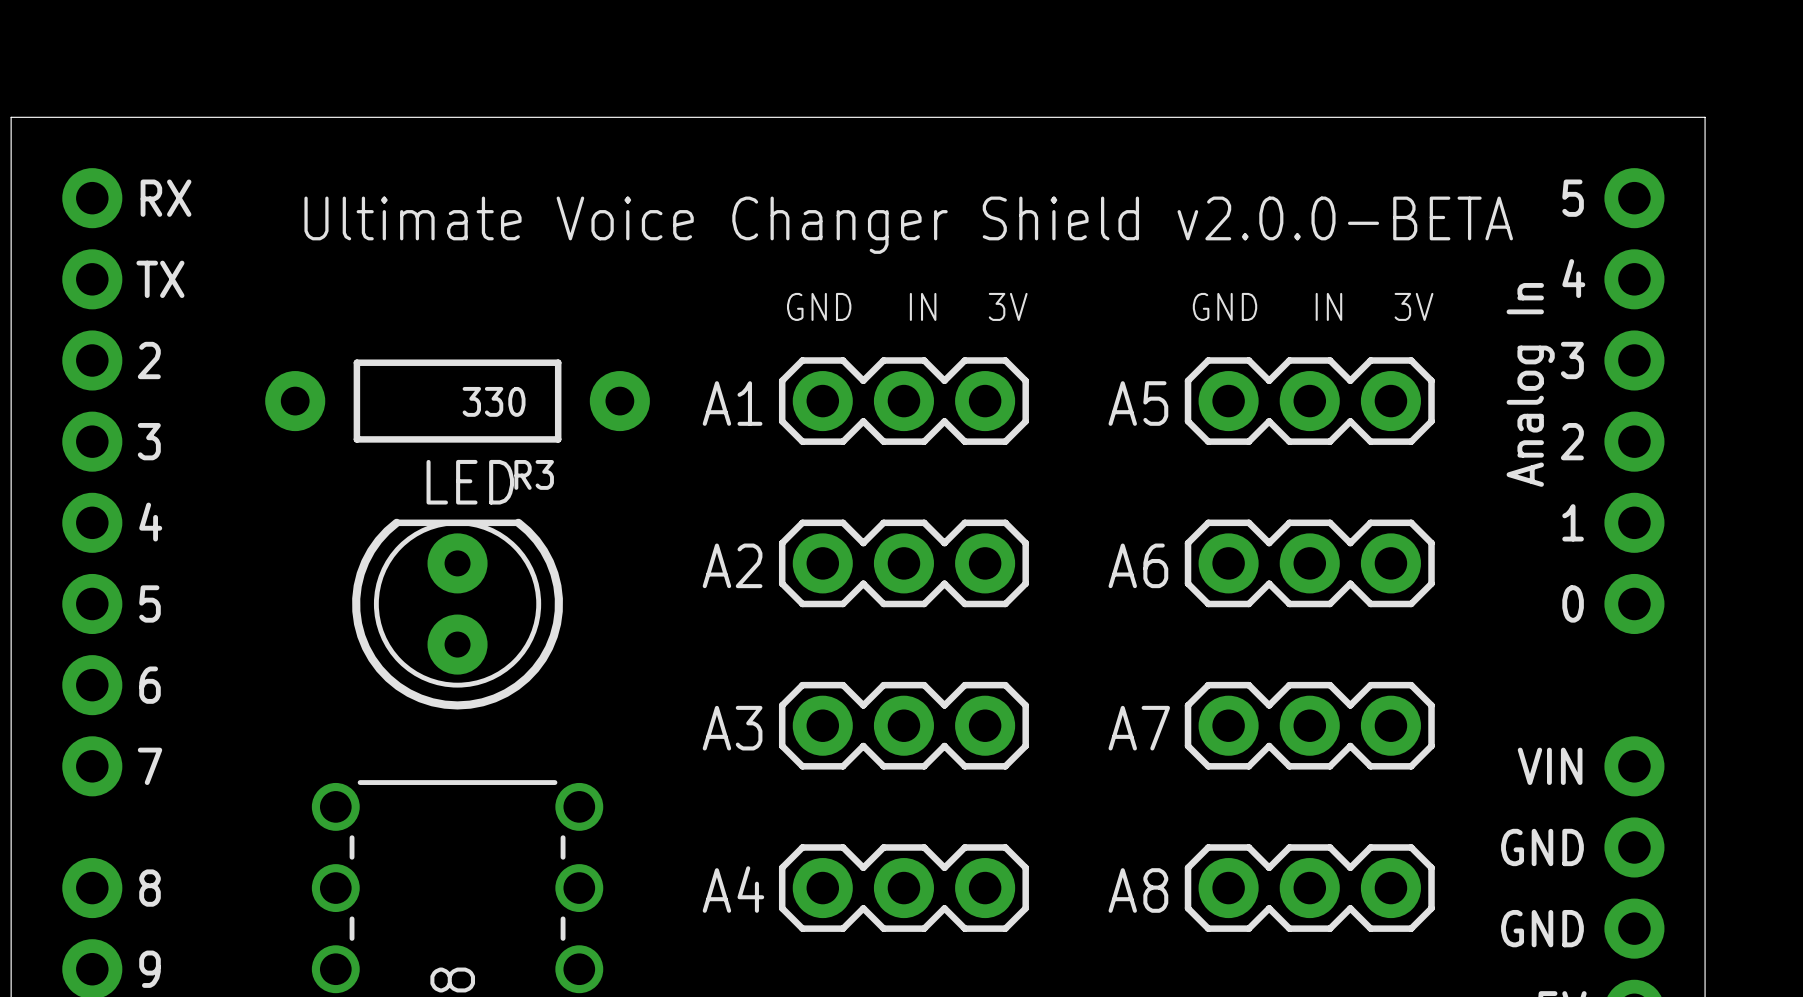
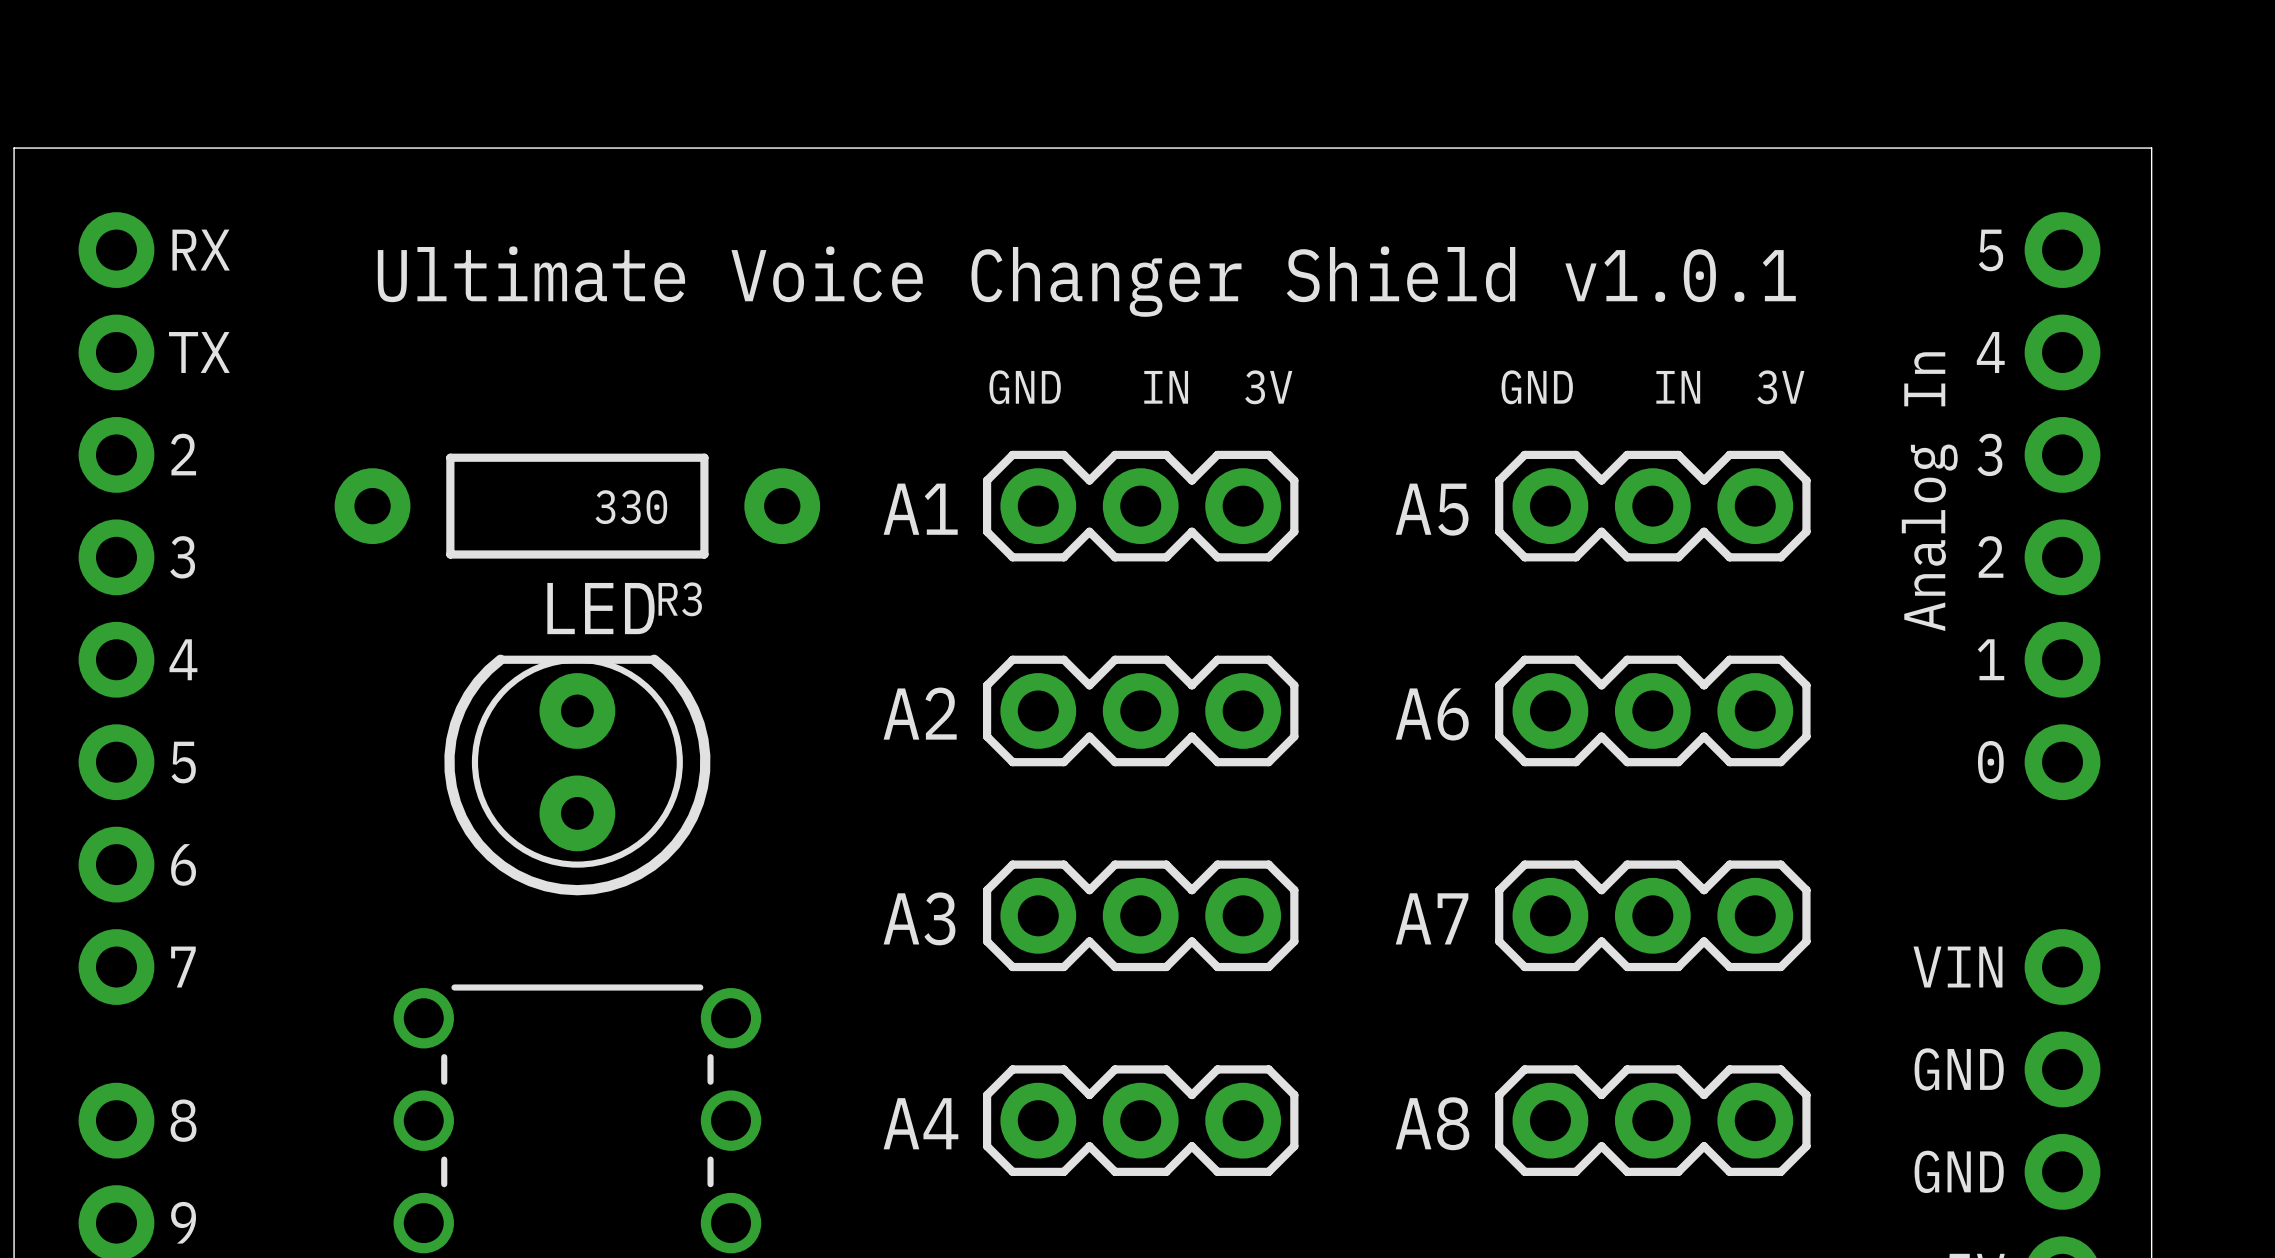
text: Ultimate Voice Changer Shield v2.0.0-BETA (908, 225) -> Ultimate Voice Changer Shield v1.0.1 (1086, 281)

